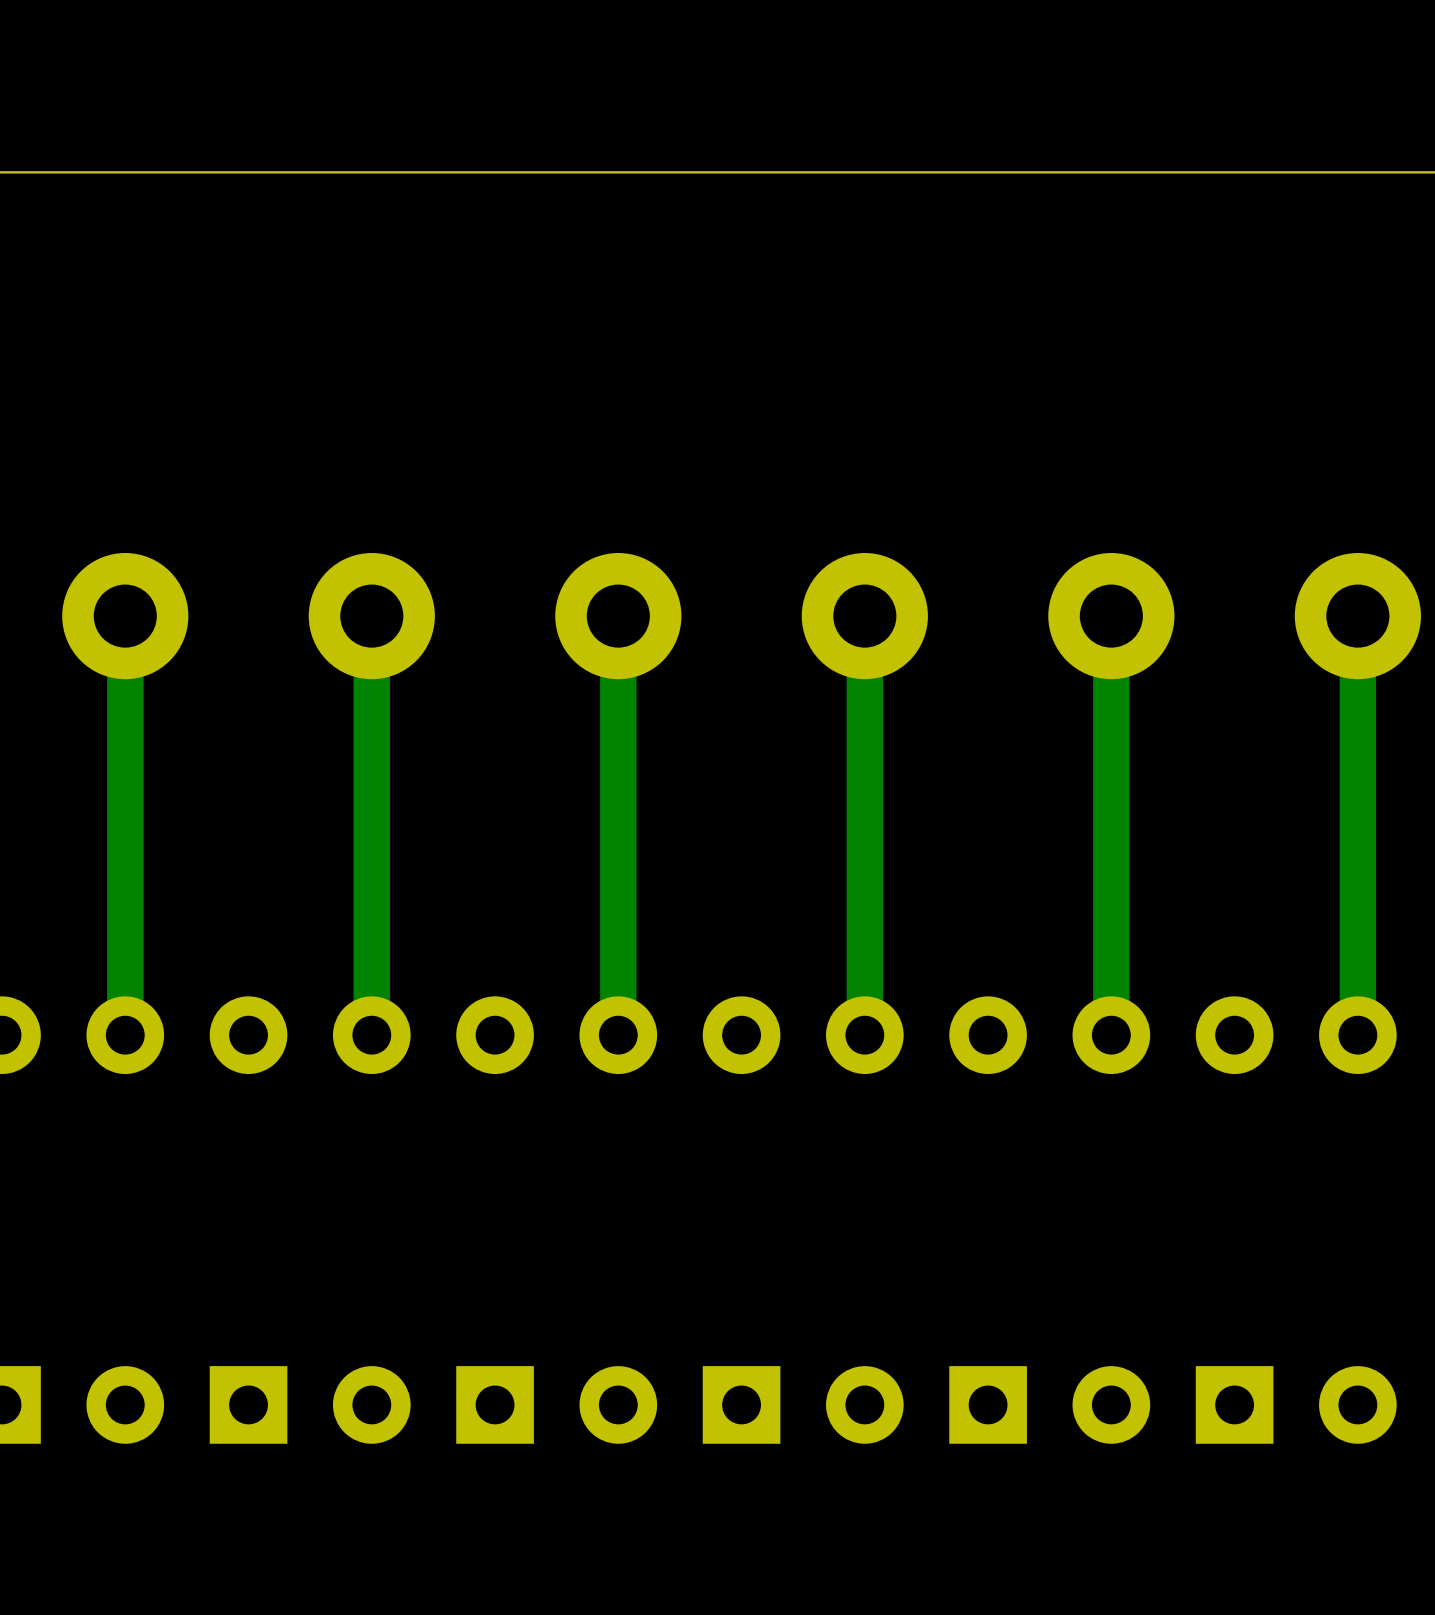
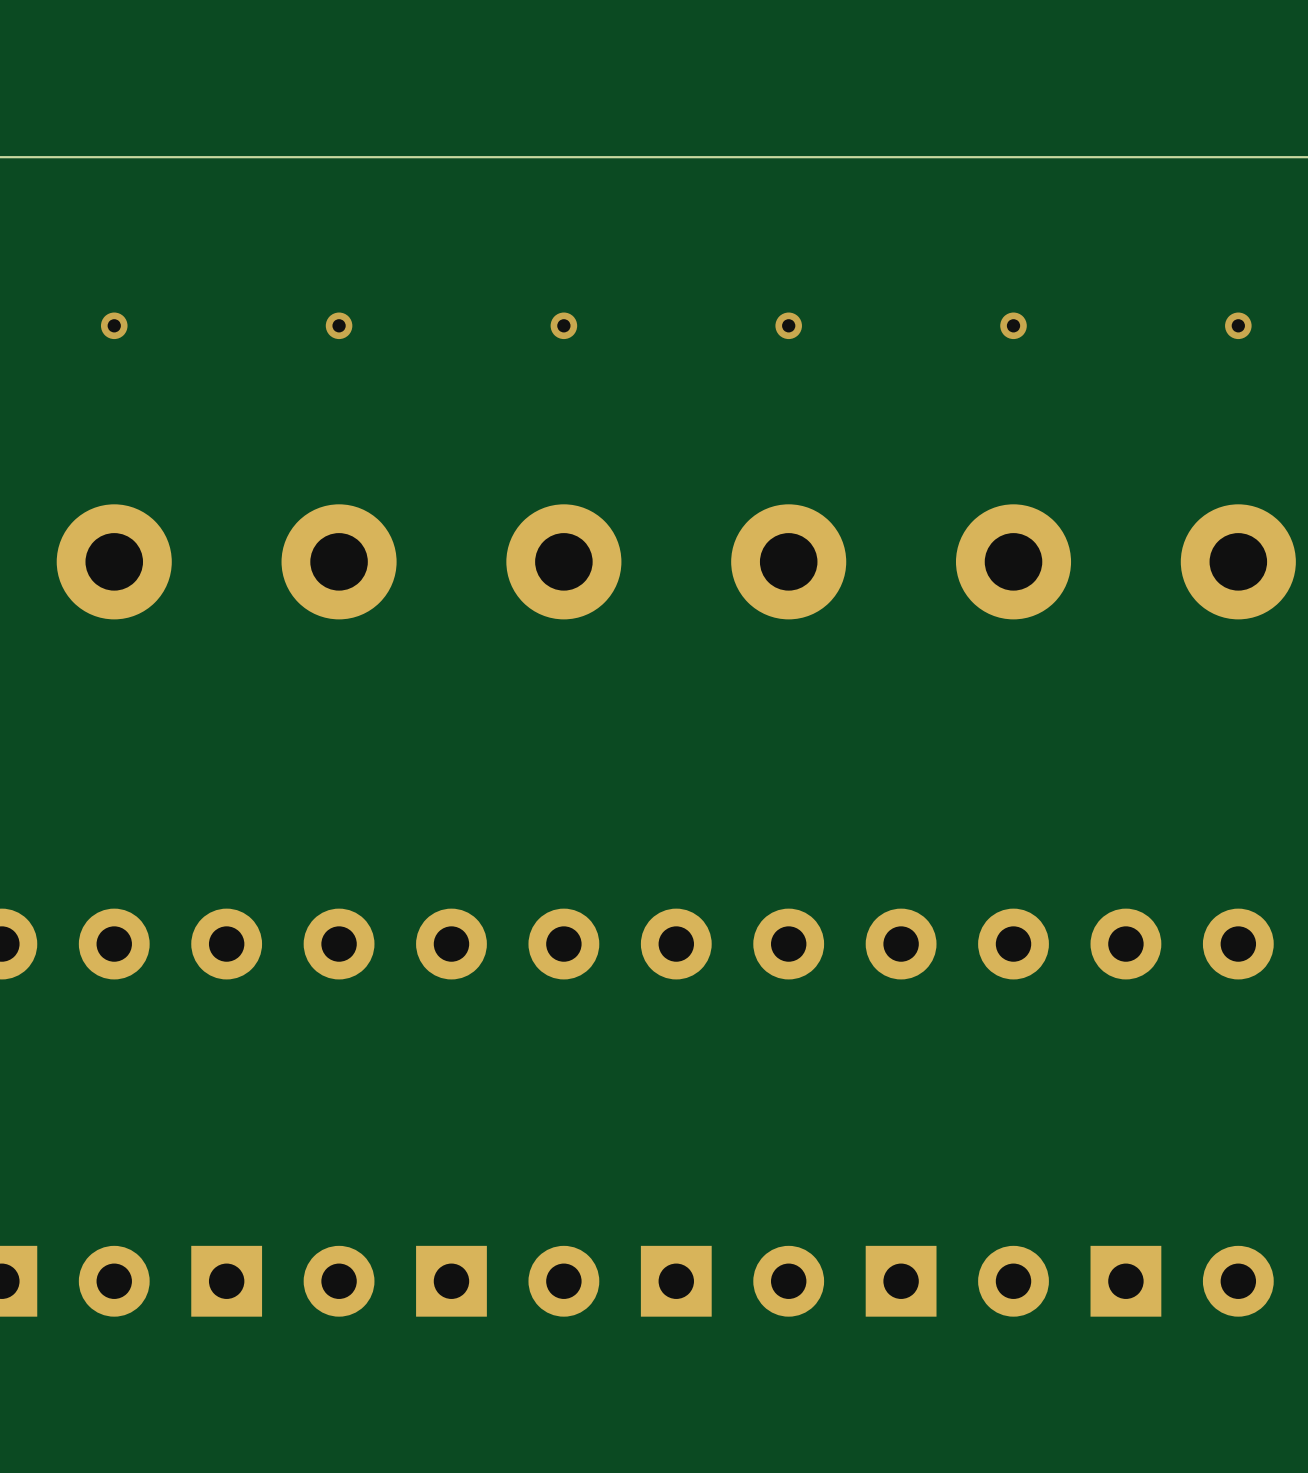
via: none -> (114, 325)
via: none -> (339, 325)
via: none -> (563, 325)
via: none -> (788, 325)
via: none -> (1013, 325)
via: none -> (1238, 325)
track: (125, 616) (125, 1035) -> none
track: (371, 616) (371, 1035) -> none
track: (618, 616) (618, 1035) -> none
track: (864, 616) (864, 1035) -> none
track: (1111, 616) (1111, 1035) -> none
track: (1357, 616) (1357, 1035) -> none

